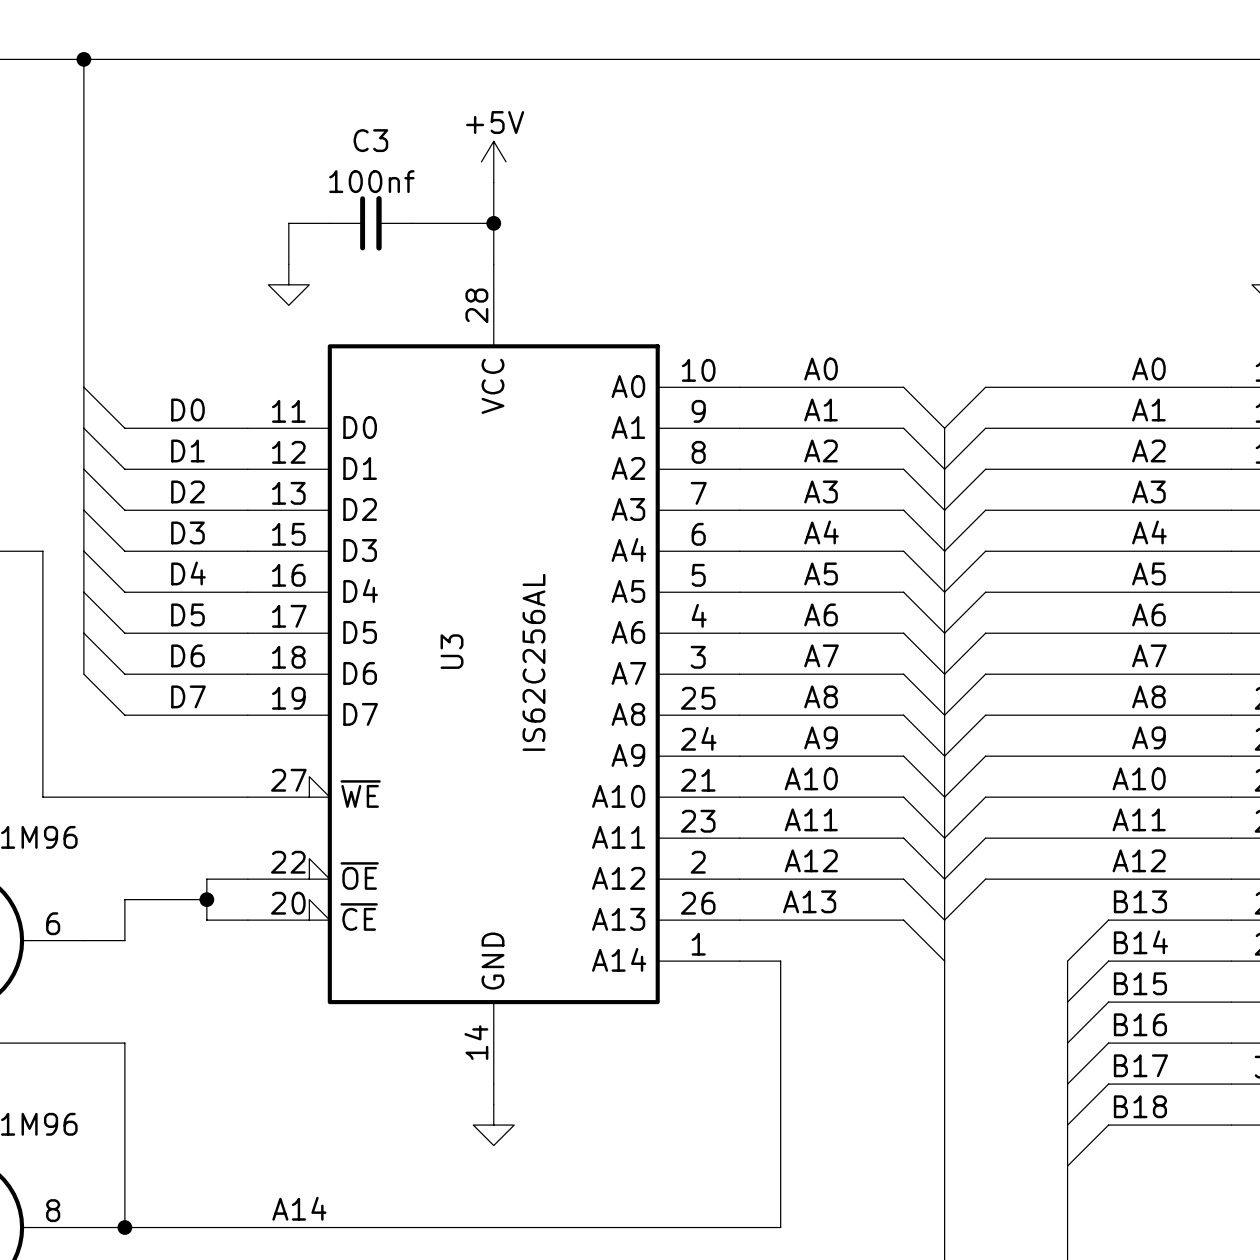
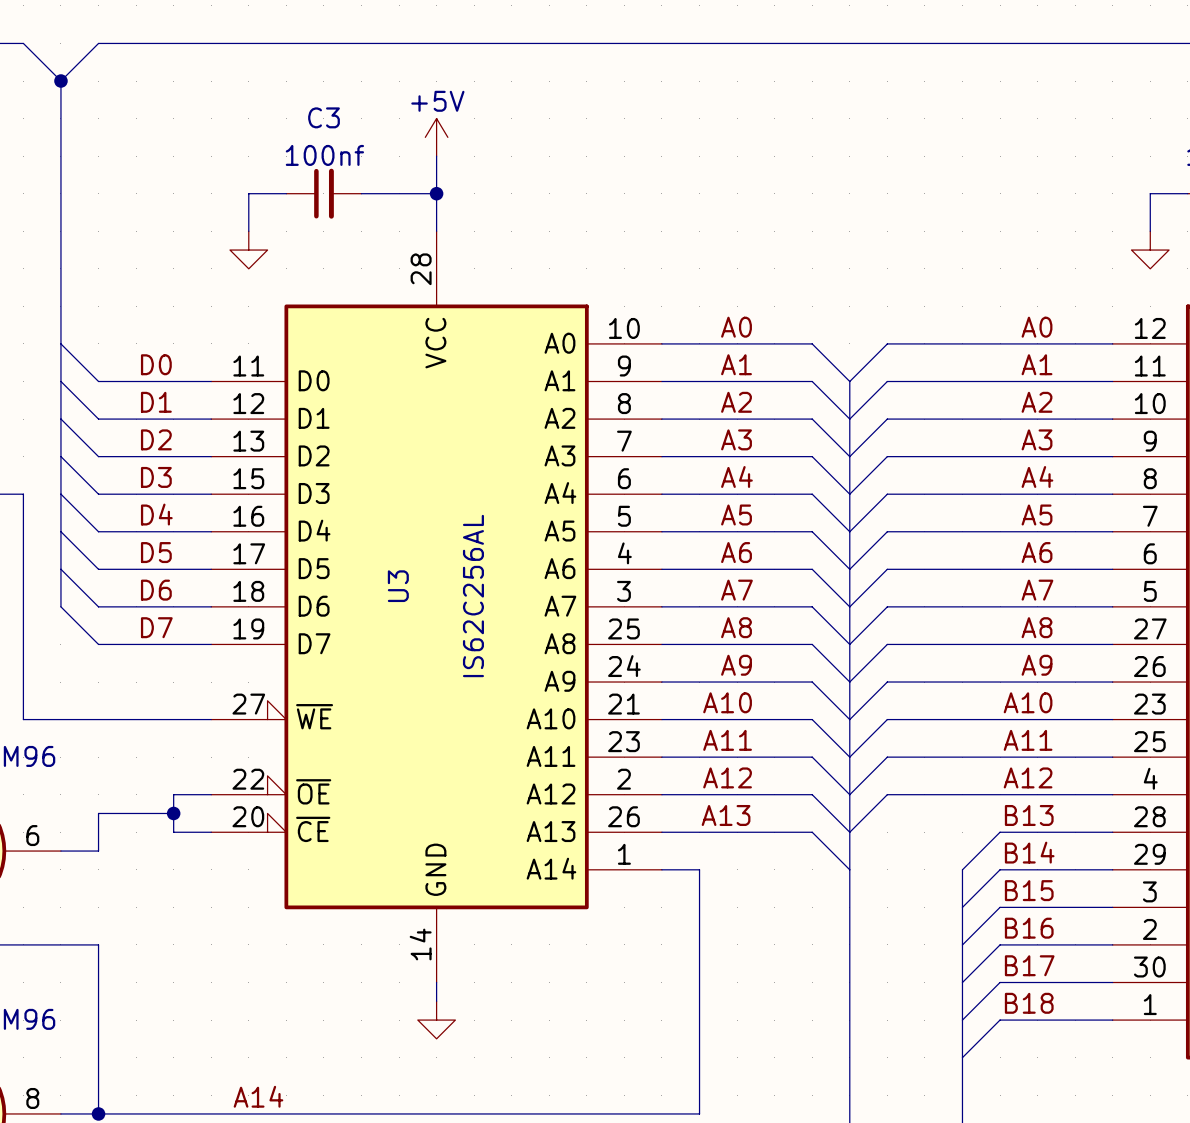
bus: (42, 59) (124, 59) -> (23, 43) (60, 81) (98, 43)
bus: (83, 59) (83, 100) -> none
junction position: (83, 59) -> (60, 81)

